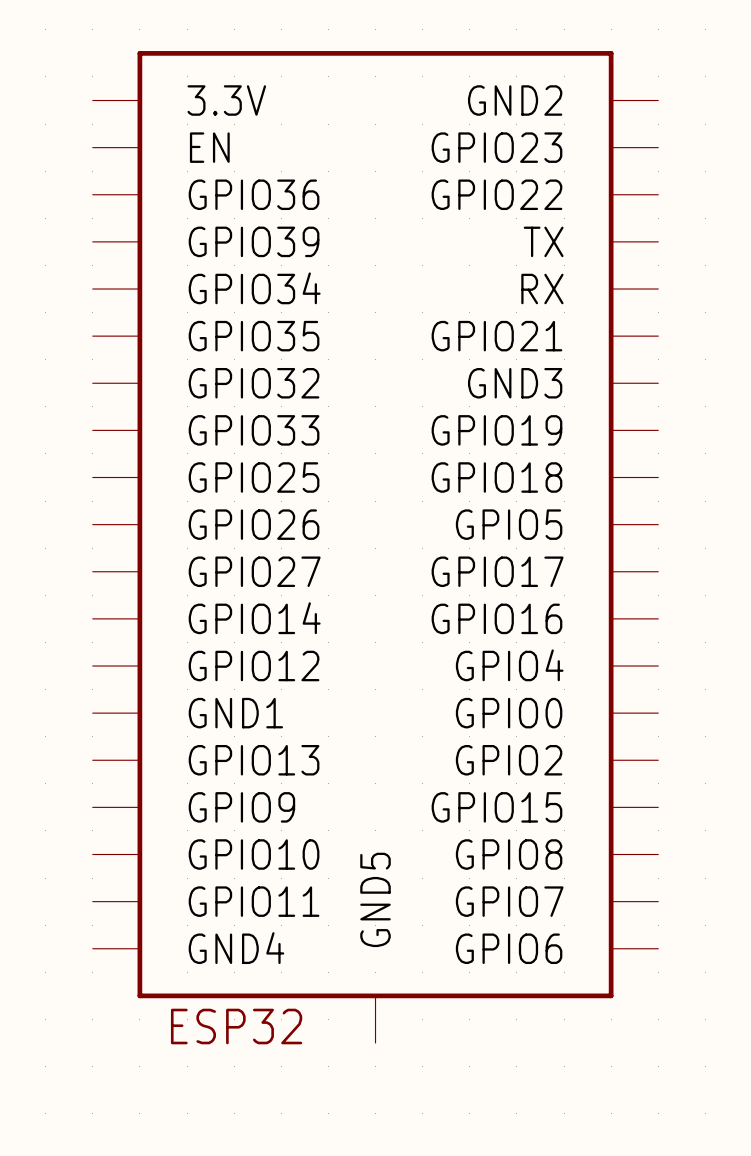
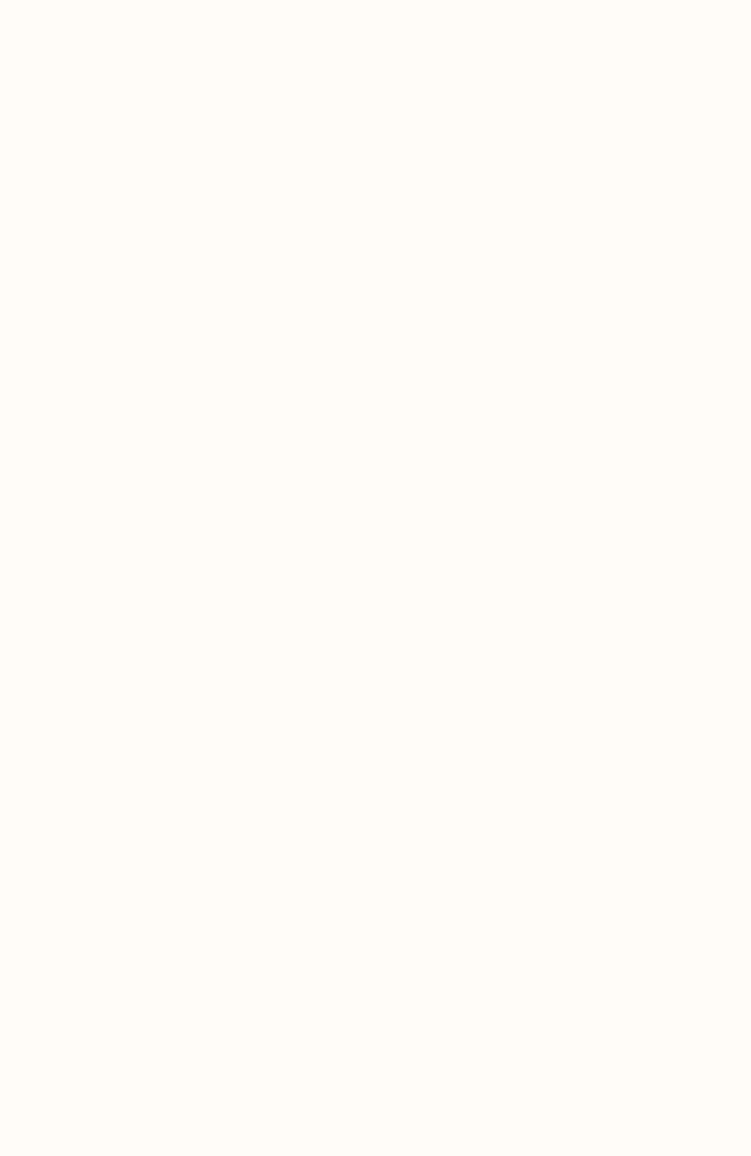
part: (375, 547) -> none

